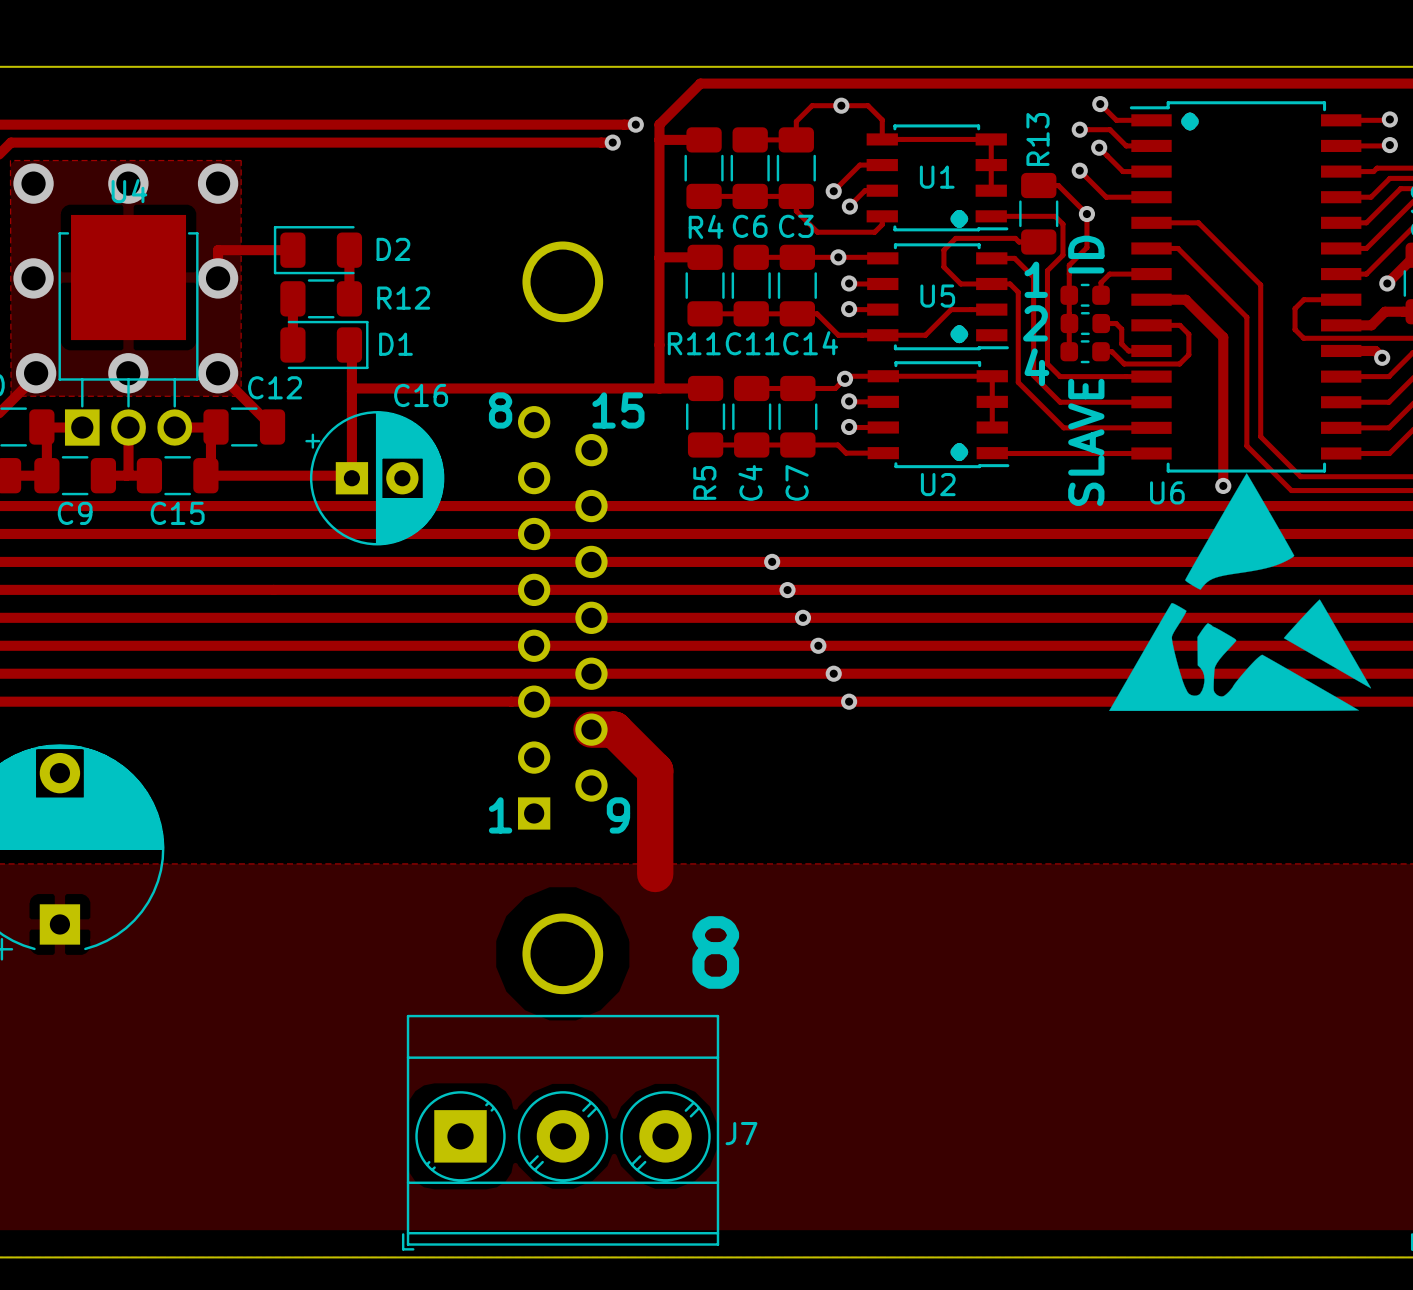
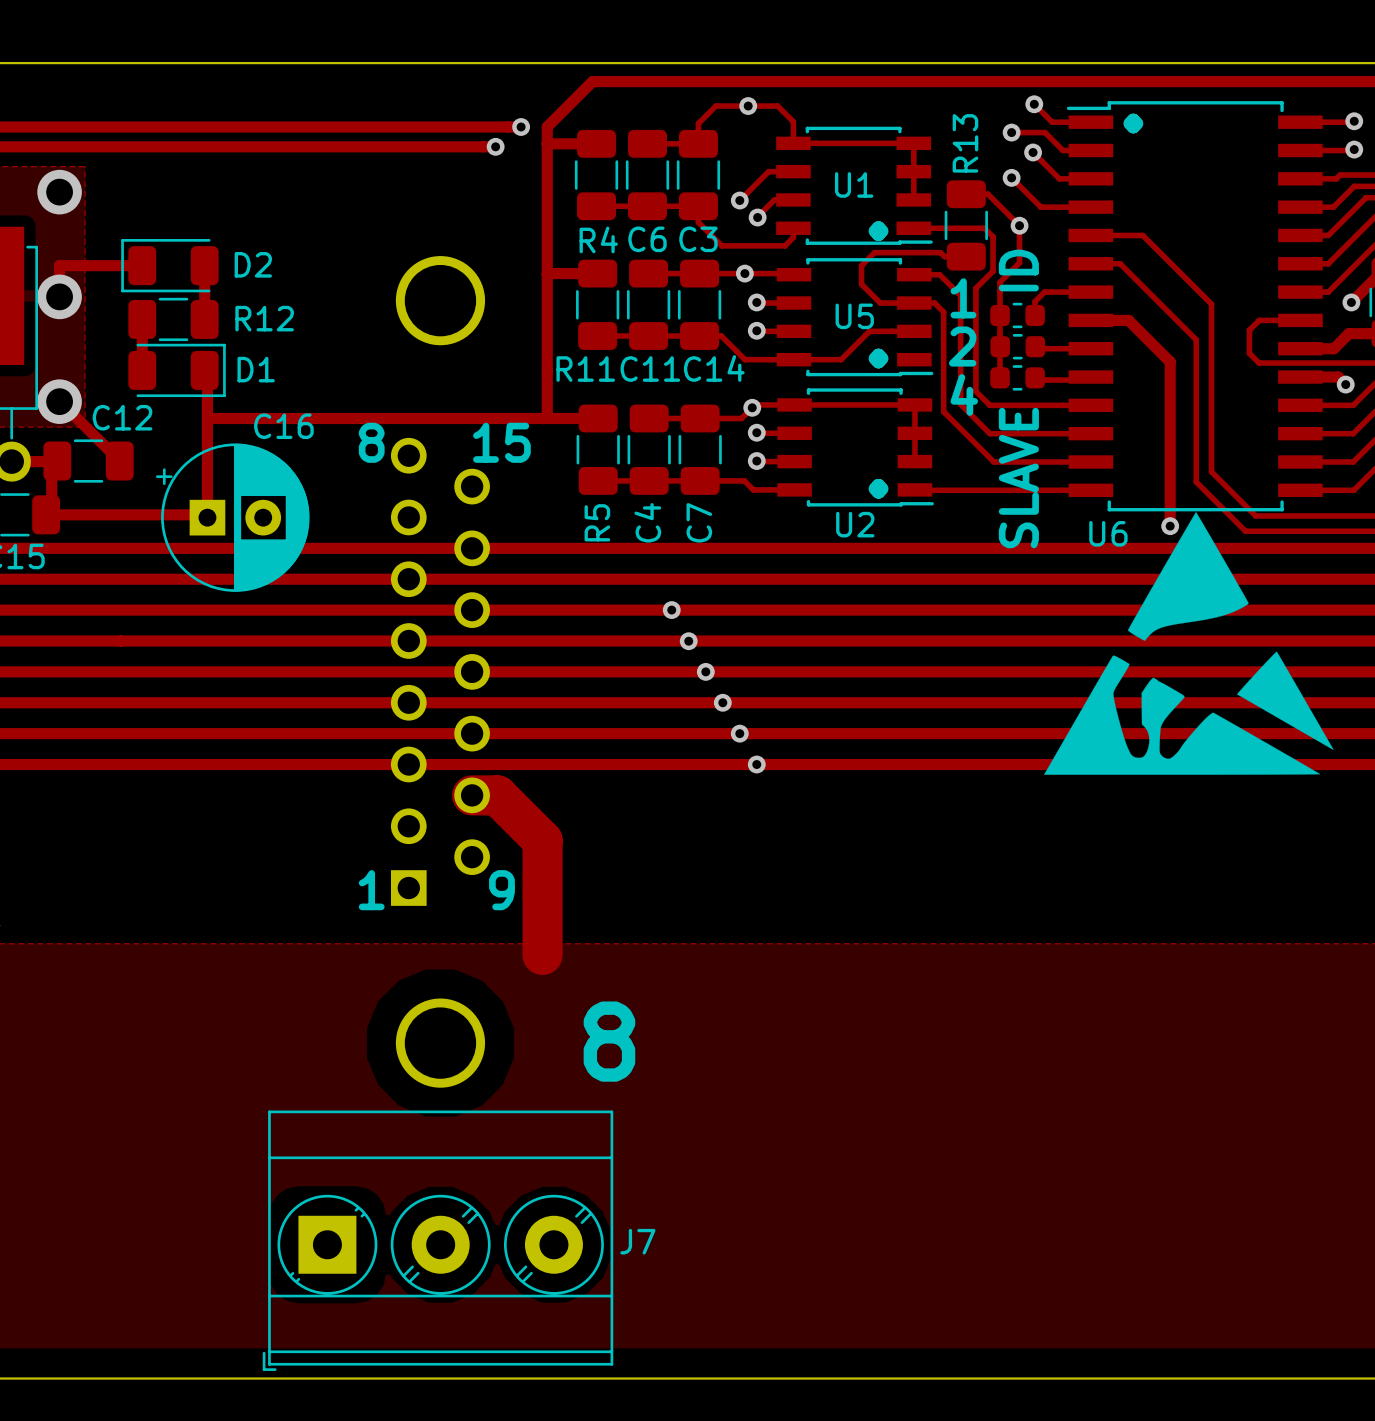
track: (1101, 323) (1116, 323) (1121, 329) (1121, 344) (1128, 350) (1151, 350) -> none
track: (1151, 325) (1179, 325) (1188, 334) (1188, 354) (1179, 363) (1124, 363) (1111, 351) (1101, 351) -> (1090, 348) (1035, 348)
track: none -> (1035, 380) (1087, 380)

